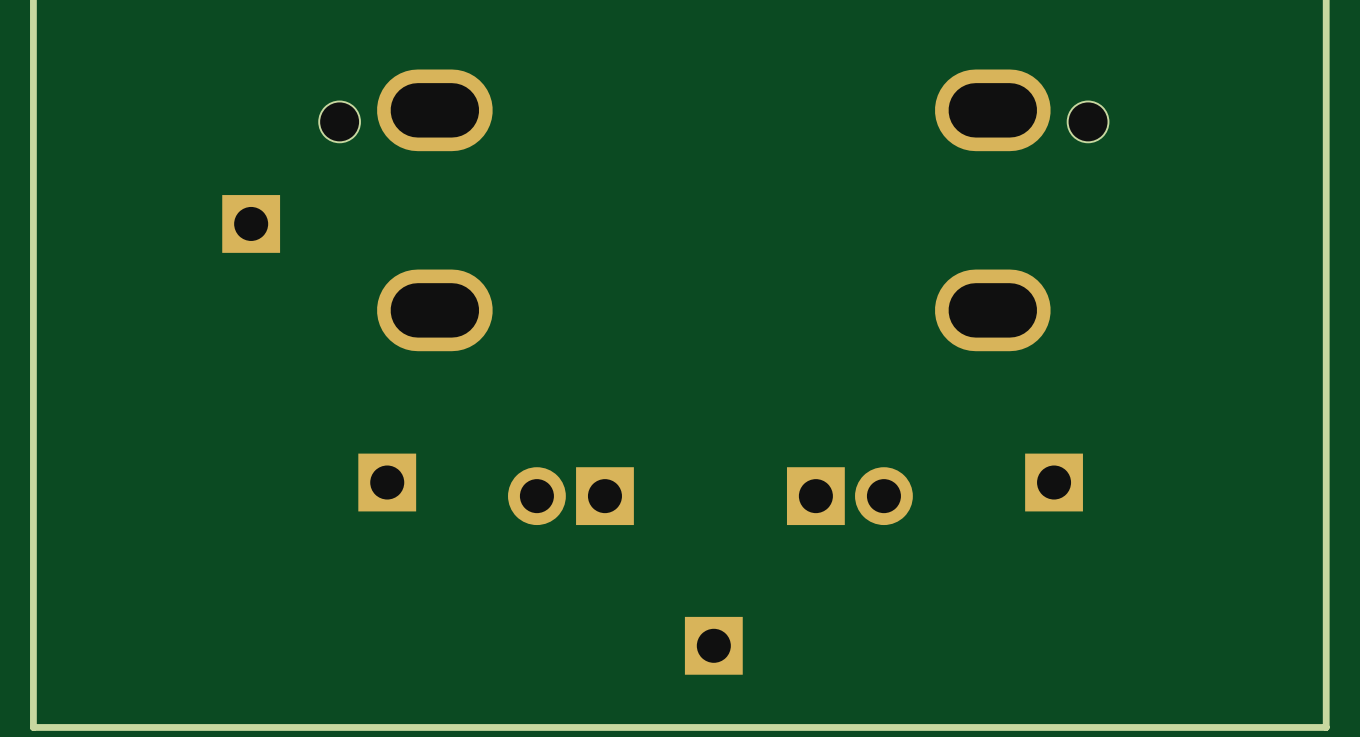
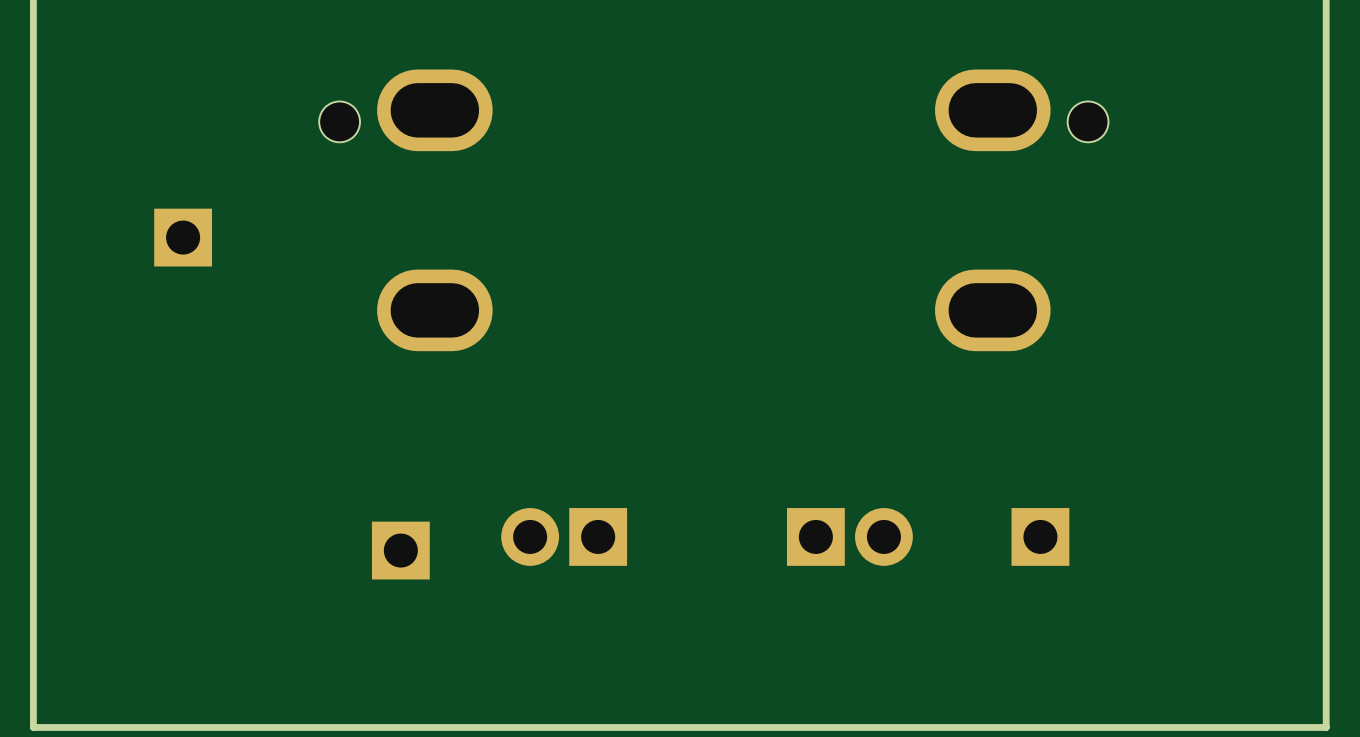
part position: (251, 223) -> (183, 237)
part position: (387, 482) -> (400, 550)
part position: (1054, 482) -> (1040, 536)
part position: (570, 496) -> (564, 536)
part position: (849, 496) -> (849, 536)
part: (713, 645) -> none

